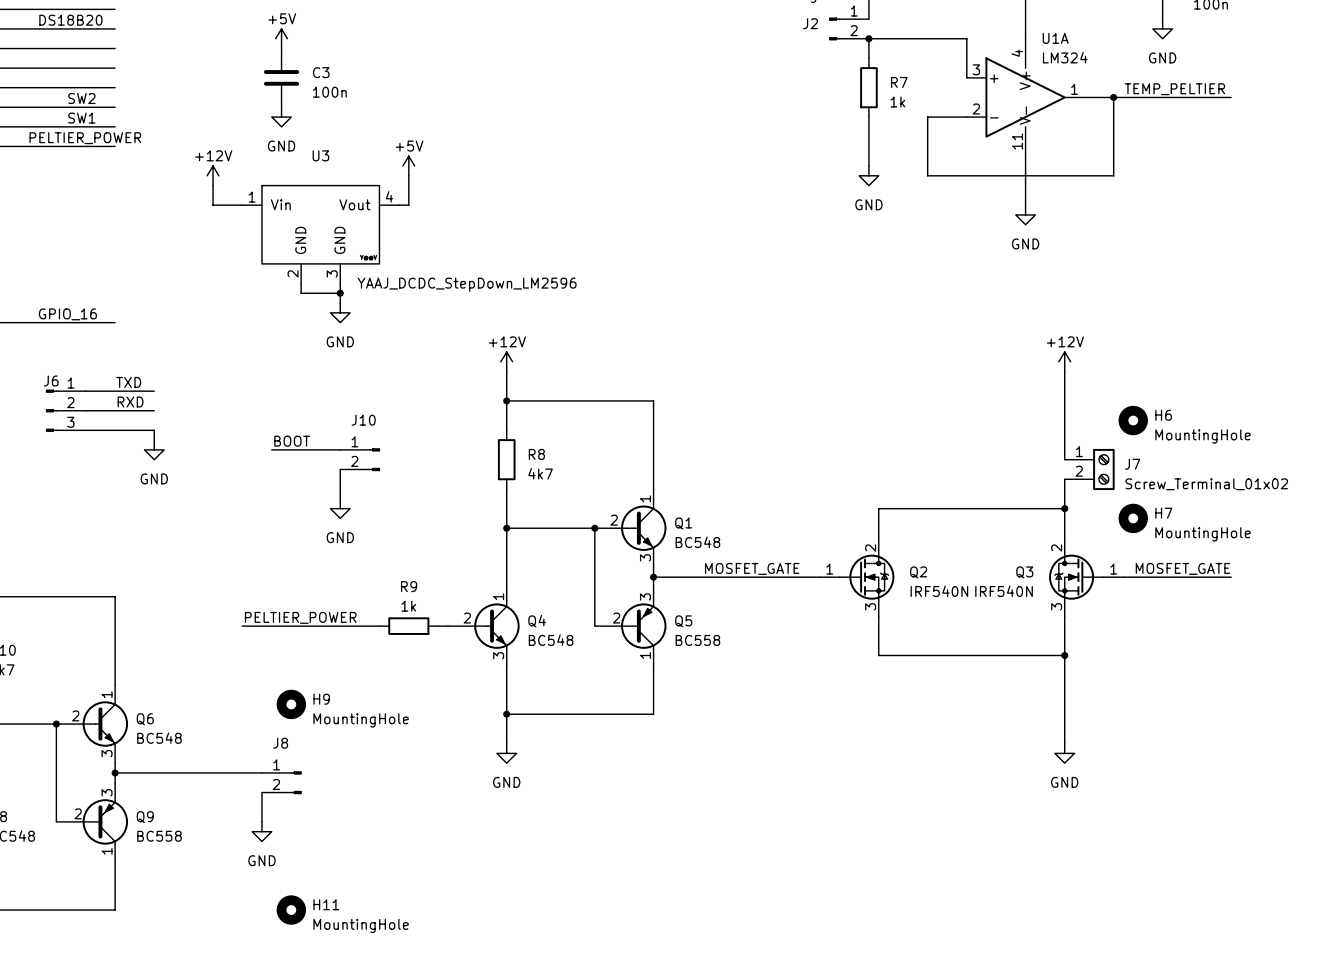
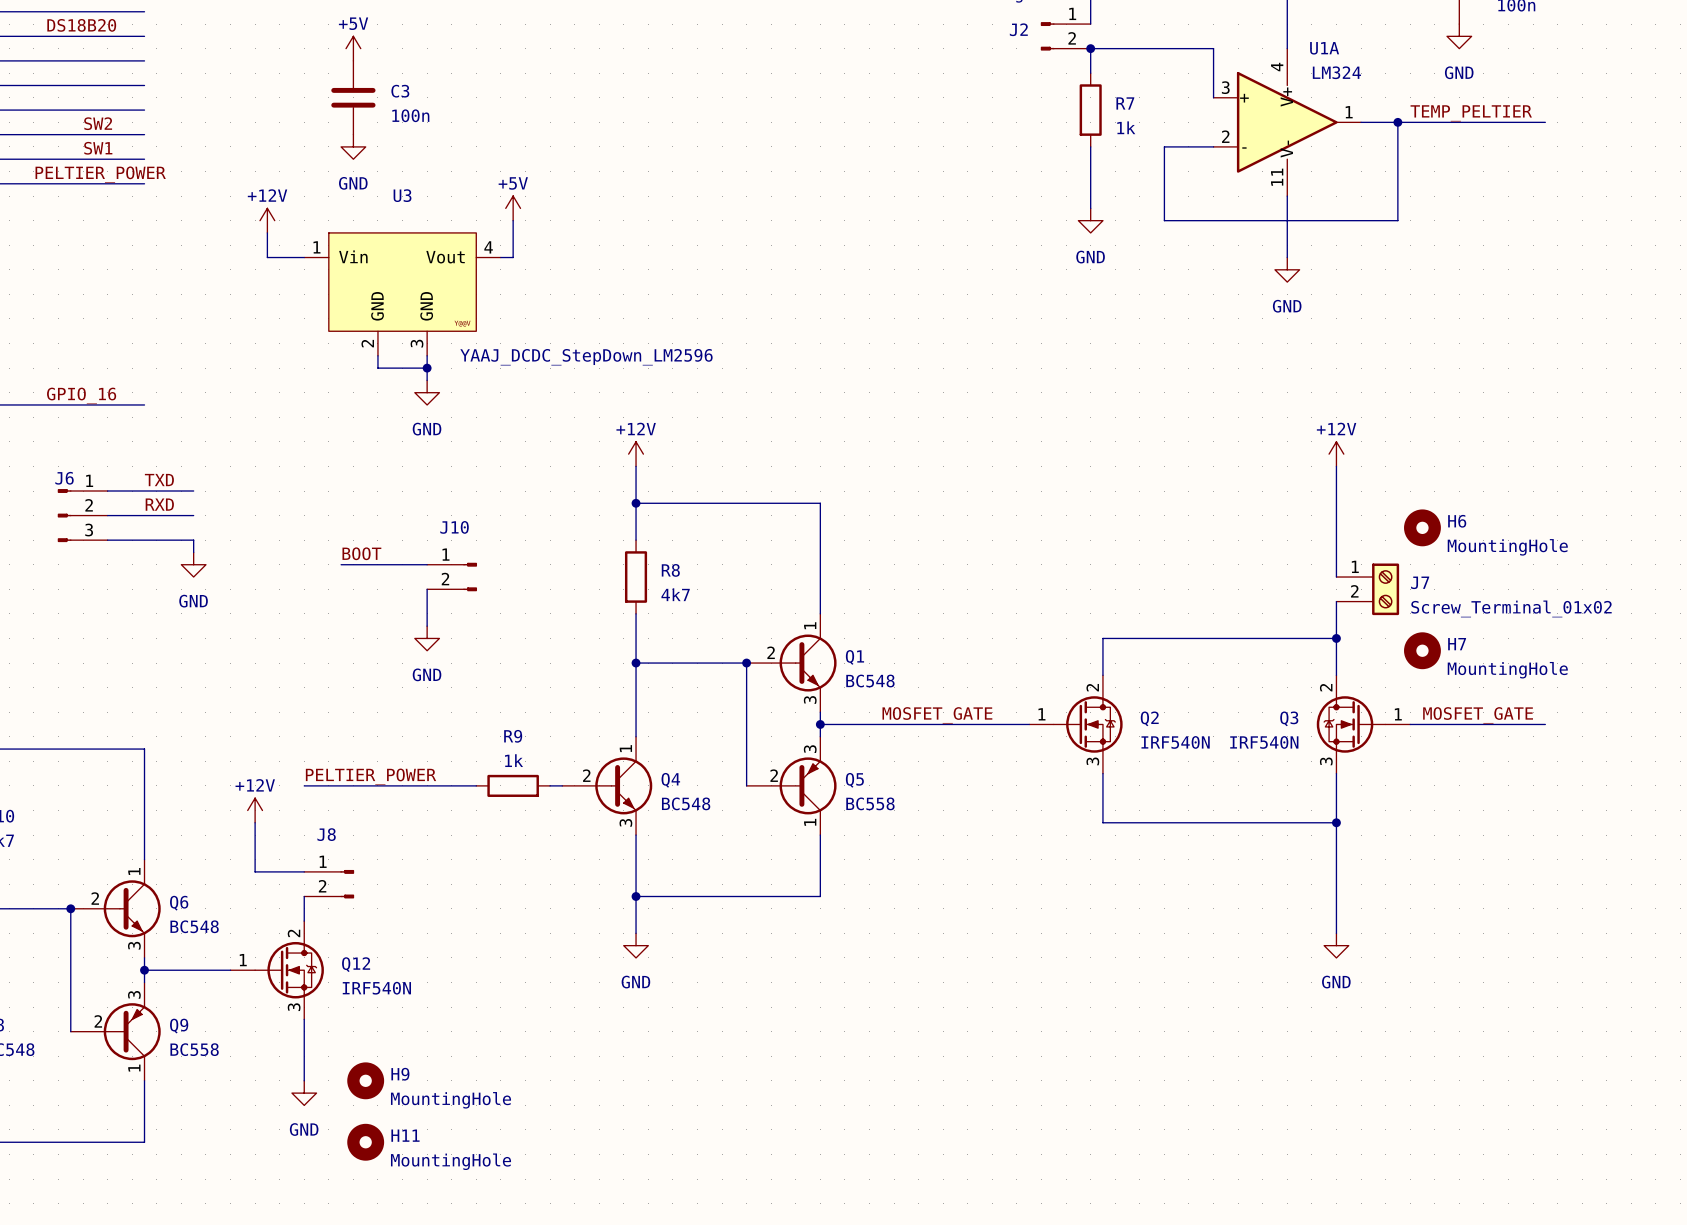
power symbol: none -> +12V (255, 810)
wire: none -> (255, 822) (255, 871) (304, 871)
H9 position: (291, 704) -> (365, 1080)
wire: none -> (304, 896) (304, 921)
Q12: none -> IRF540N (277, 970)
J8 position: (281, 782) -> (329, 884)
wire: (261, 792) (261, 821) -> none
wire: none -> (304, 1019) (304, 1080)
power symbol position: GND (261, 831) -> GND (304, 1093)

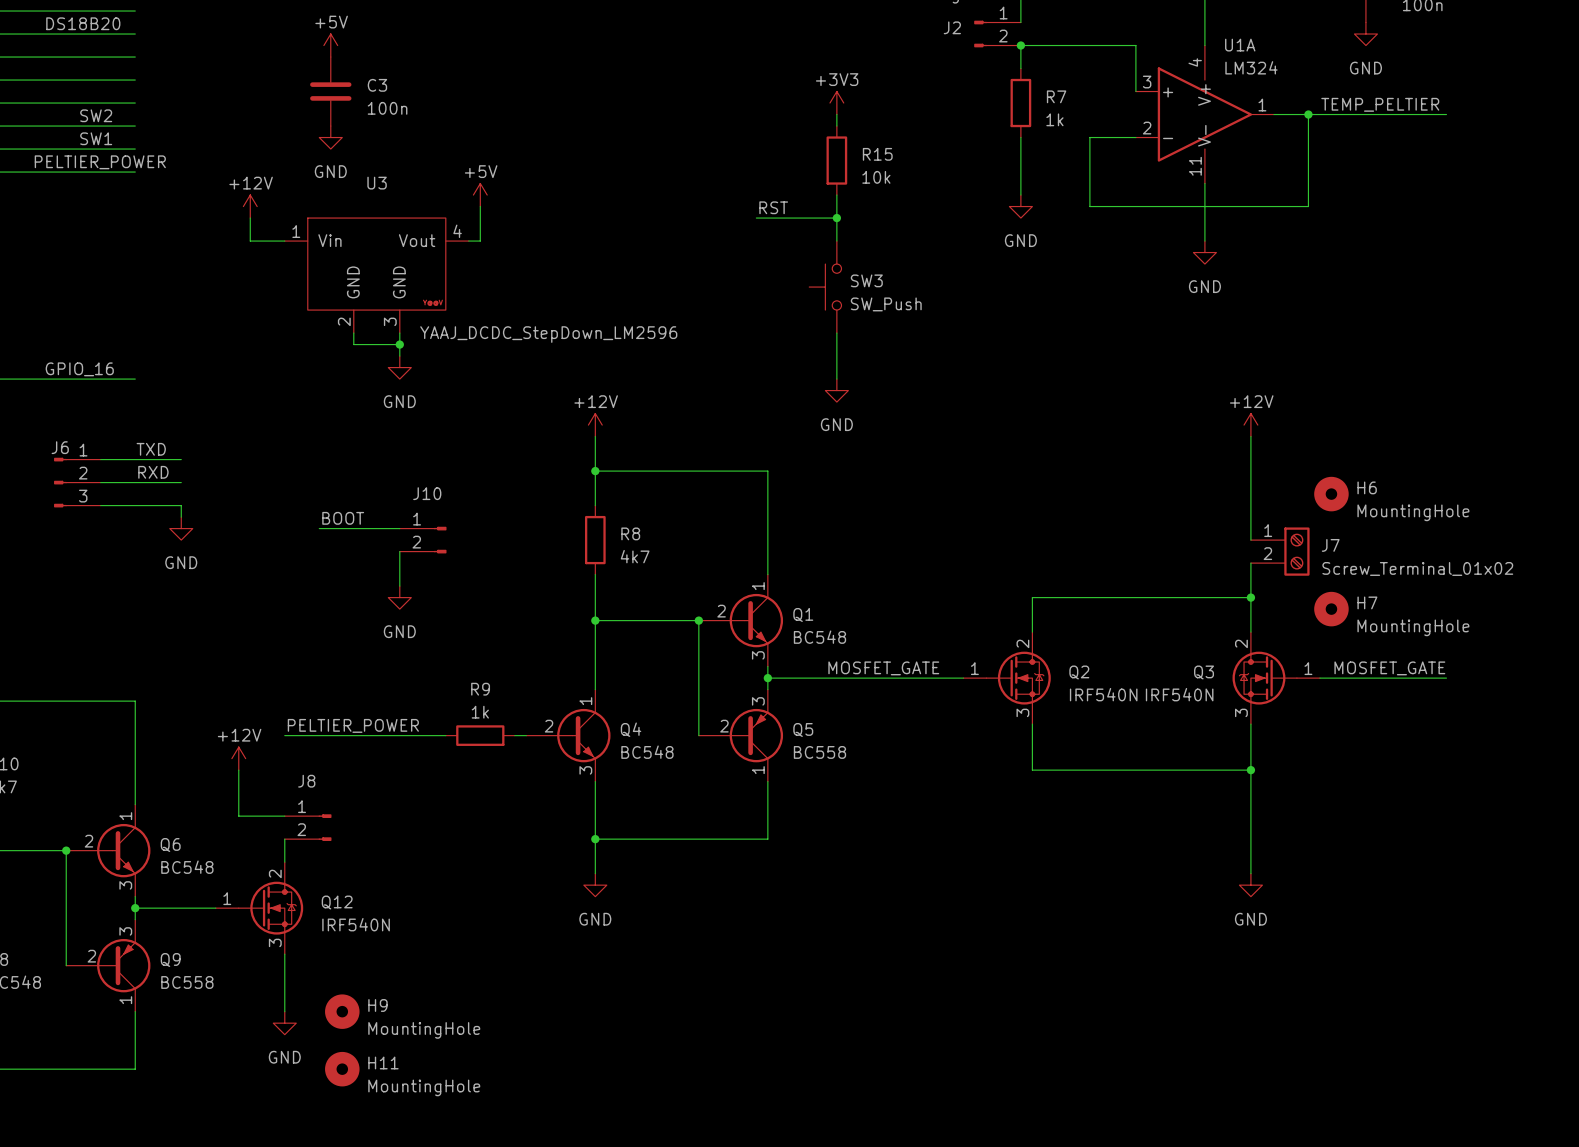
power symbol: none -> +3V3 (836, 103)
wire: none -> (836, 114) (836, 126)
R15: none -> 10k (836, 160)
wire: none -> (836, 195) (836, 241)
label: none -> RST (773, 207)
wire: none -> (756, 218) (836, 218)
junction: none -> (836, 218)
SW3: none -> SW_Push (825, 287)
wire: none -> (836, 333) (836, 379)
power symbol: none -> GND (836, 390)

